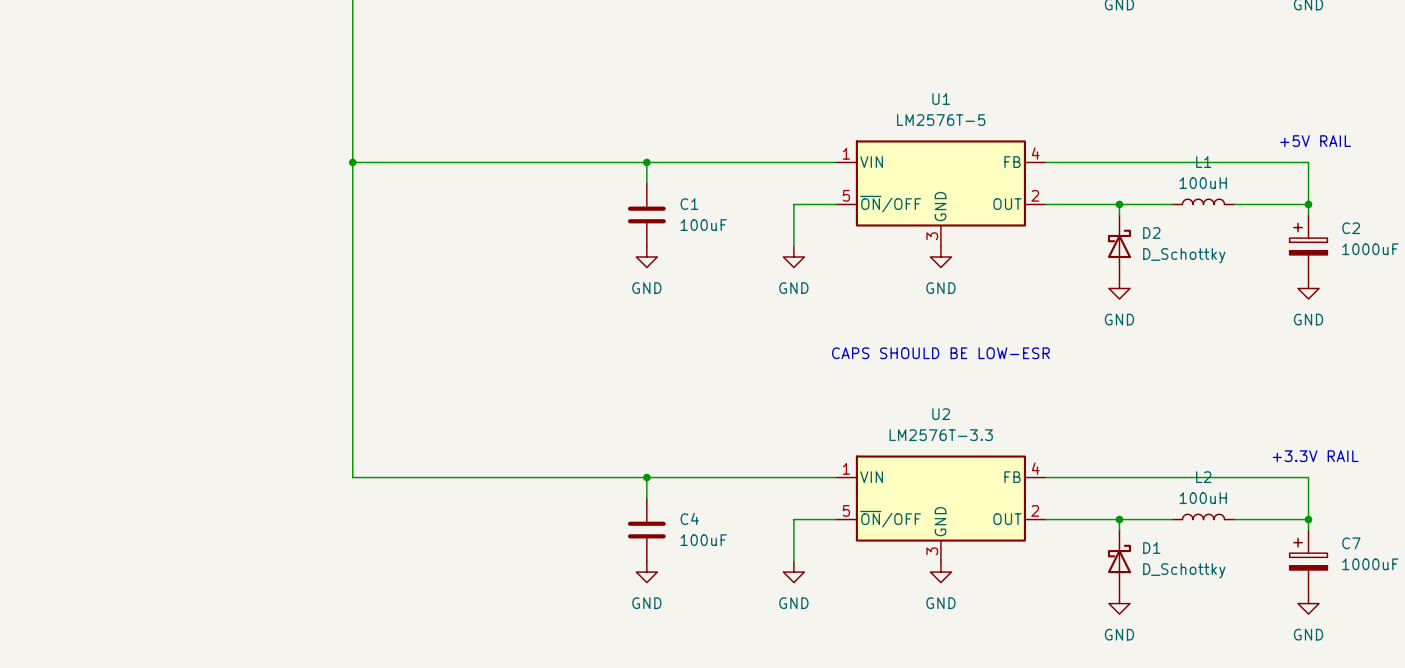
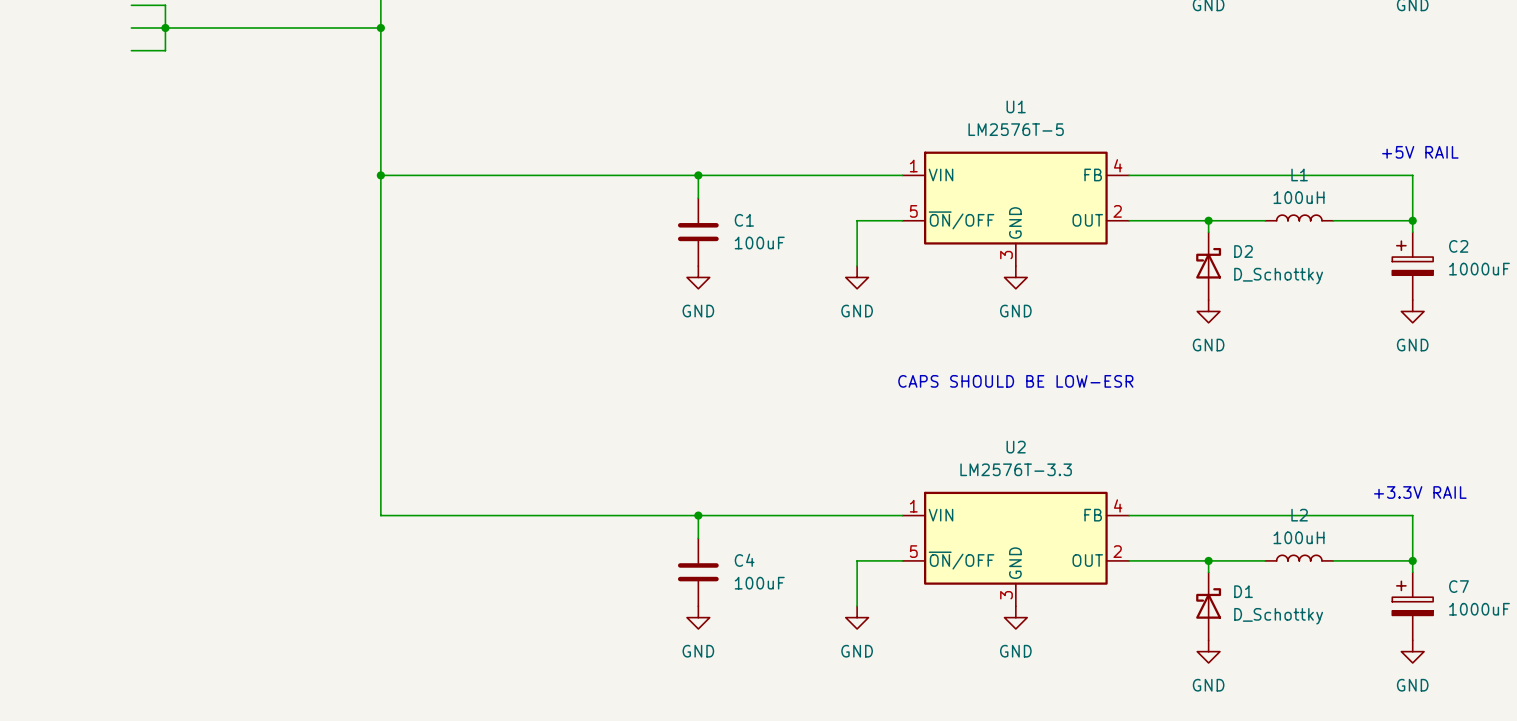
wire: none -> (131, 5) (165, 5) (165, 50) (131, 50)
wire: none -> (131, 27) (380, 27)
junction: none -> (165, 27)
junction: none -> (380, 27)

